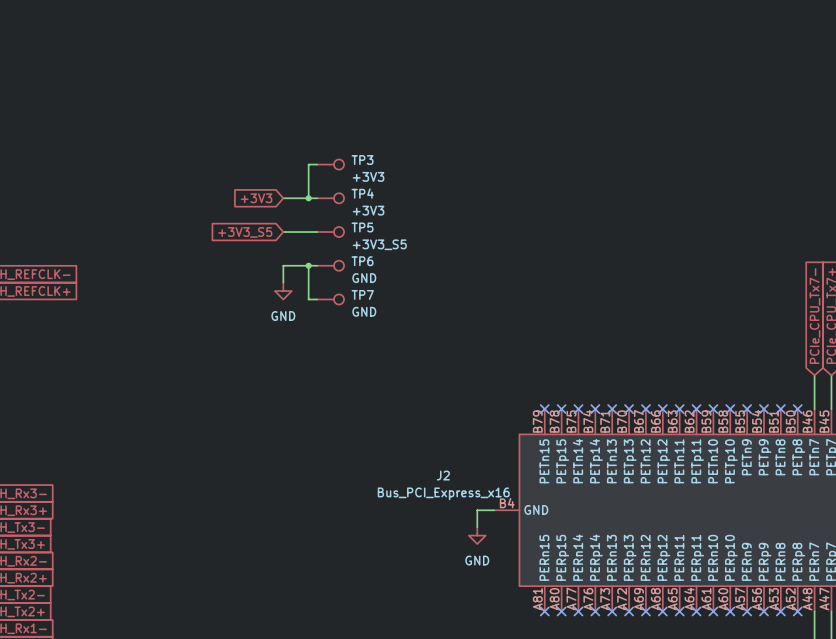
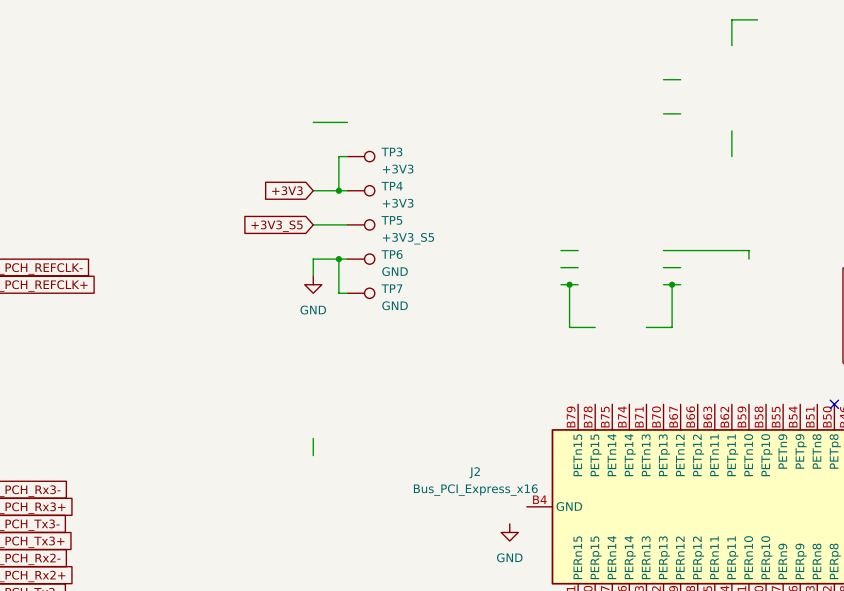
wire: none -> (757, 19) (731, 19) (731, 45)
wire: none -> (663, 79) (680, 79)
wire: none -> (663, 113) (680, 113)
wire: none -> (313, 122) (347, 122)
wire: none -> (731, 130) (731, 156)
wire: none -> (561, 250) (578, 250)
wire: none -> (663, 250) (748, 250) (748, 259)
wire: none -> (561, 267) (578, 267)
wire: none -> (663, 267) (680, 267)
wire: none -> (561, 284) (578, 284)
wire: none -> (569, 284) (569, 327) (595, 327)
junction: none -> (569, 284)
wire: none -> (663, 284) (680, 284)
wire: none -> (672, 284) (672, 327) (646, 327)
junction: none -> (672, 284)
no-connect mark: (544, 409) -> none
no-connect mark: (561, 409) -> none
no-connect mark: (578, 409) -> none
no-connect mark: (595, 409) -> none
no-connect mark: (612, 409) -> none
no-connect mark: (629, 409) -> none
no-connect mark: (645, 409) -> none
no-connect mark: (662, 409) -> none
no-connect mark: (679, 409) -> none
no-connect mark: (696, 409) -> none
no-connect mark: (713, 409) -> none
no-connect mark: (730, 409) -> none
no-connect mark: (747, 409) -> none
no-connect mark: (763, 409) -> none
no-connect mark: (780, 409) -> none
wire: none -> (313, 438) (313, 455)
wire: (494, 510) (477, 510) (477, 527) -> none

